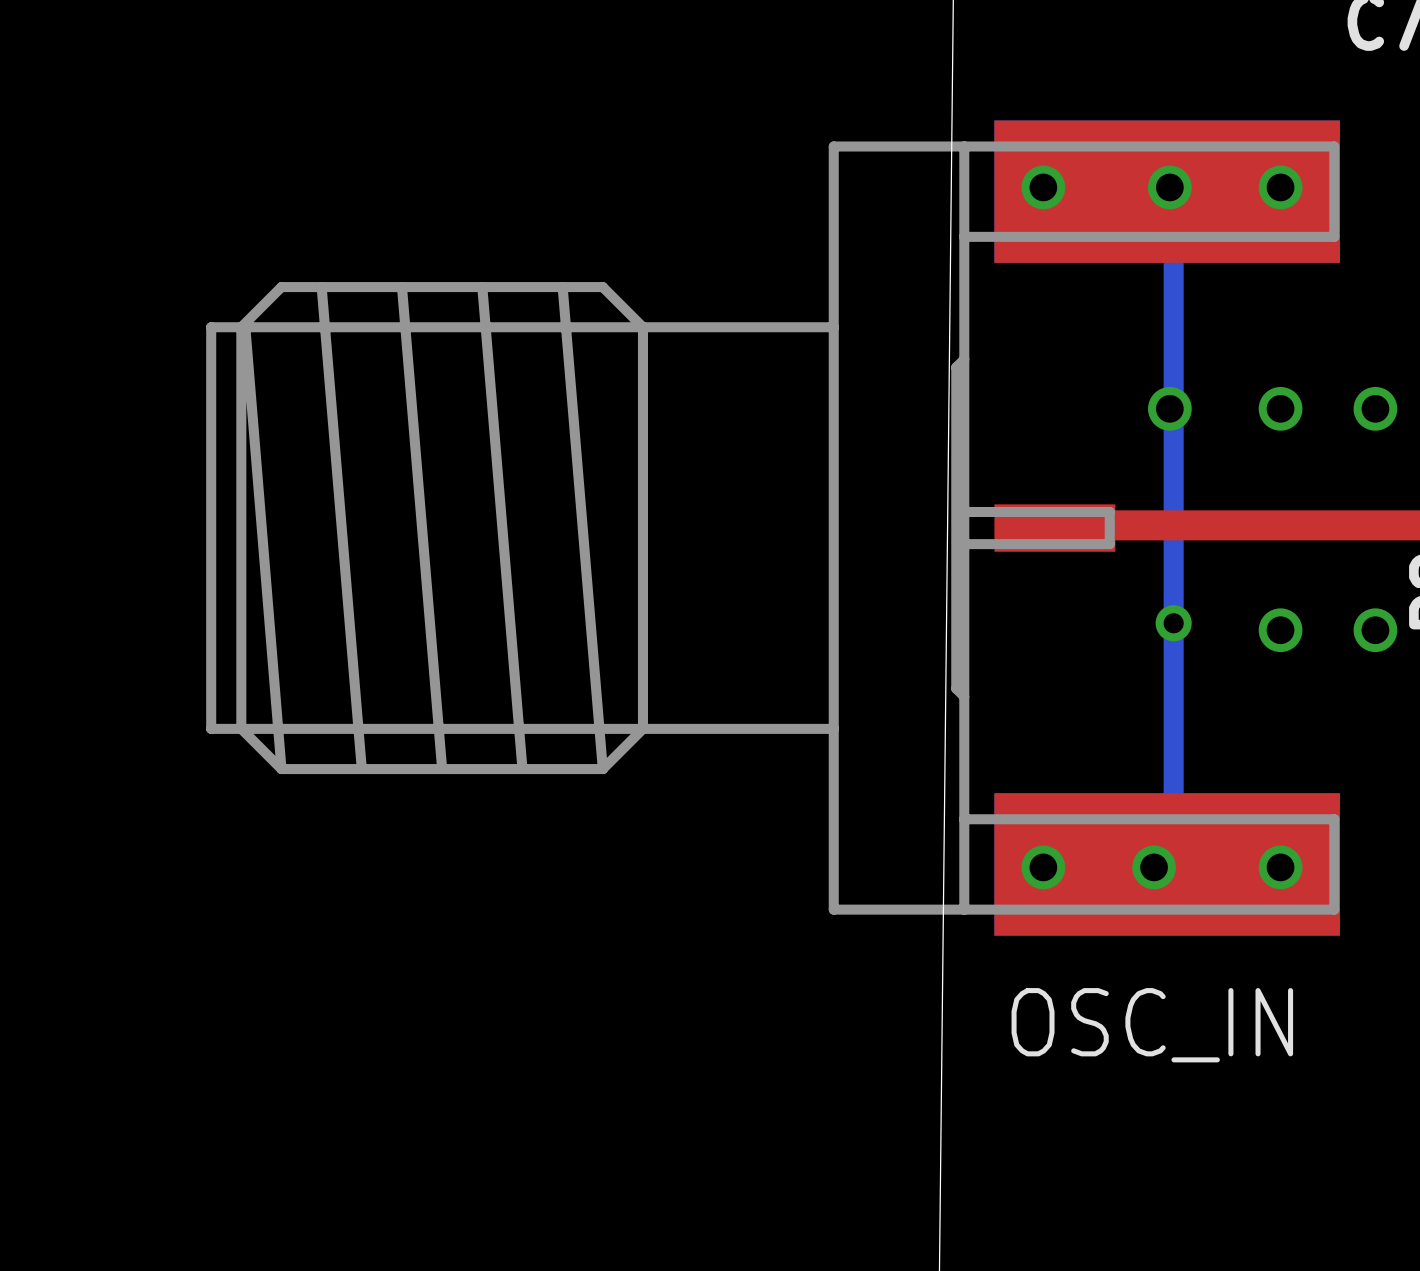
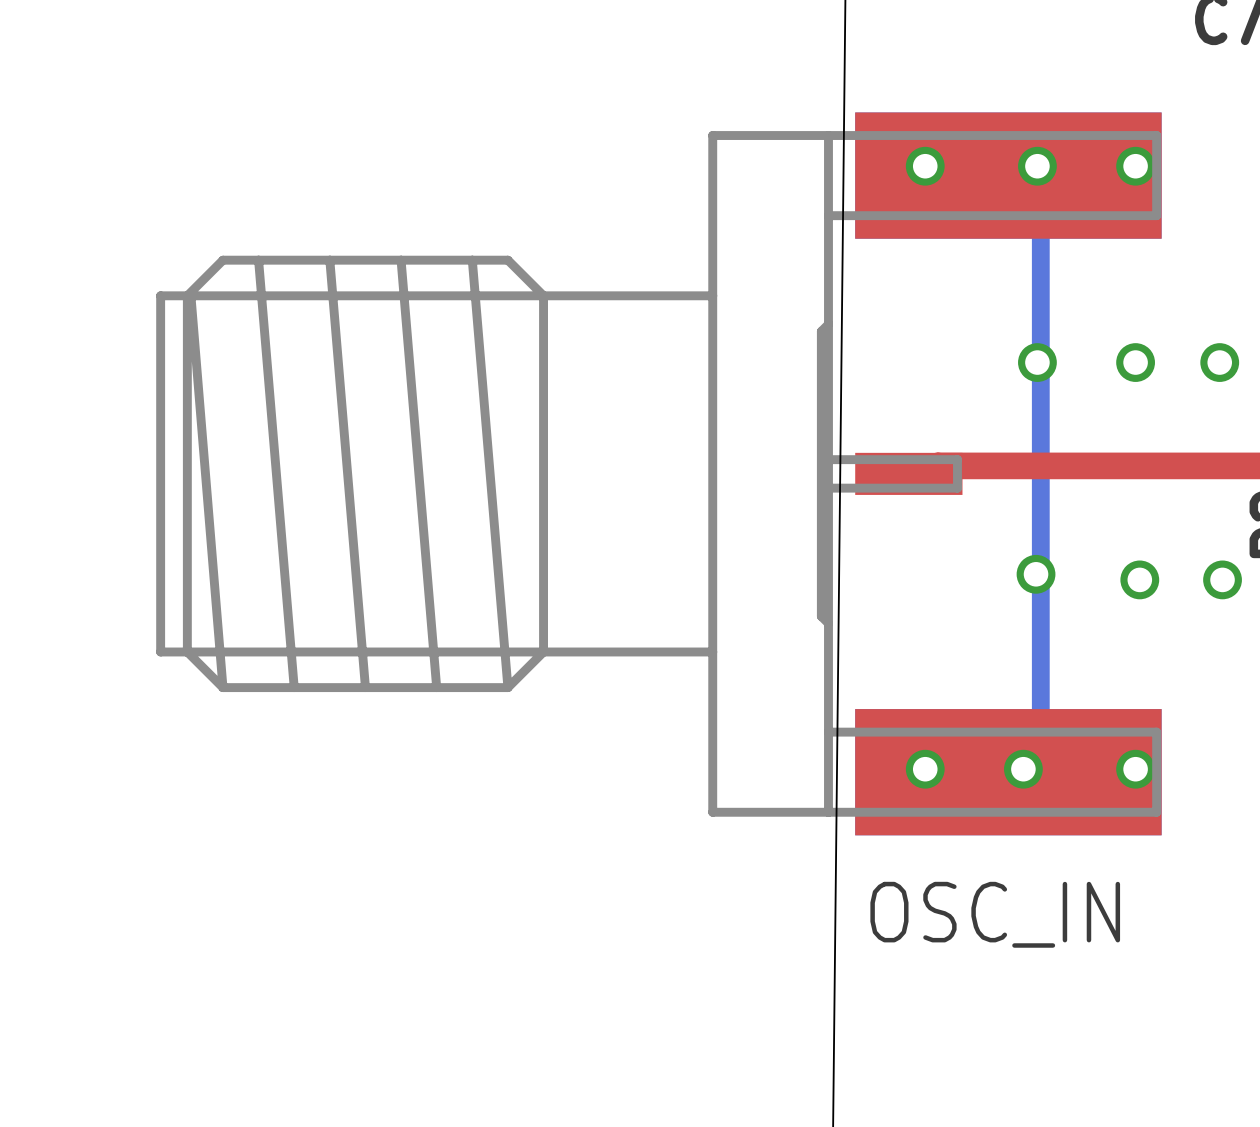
OSC_IN position: (773, 528) -> (658, 473)
via position: (1173, 623) -> (1036, 574)
via position: (1280, 630) -> (1139, 579)
via position: (1375, 630) -> (1222, 579)

